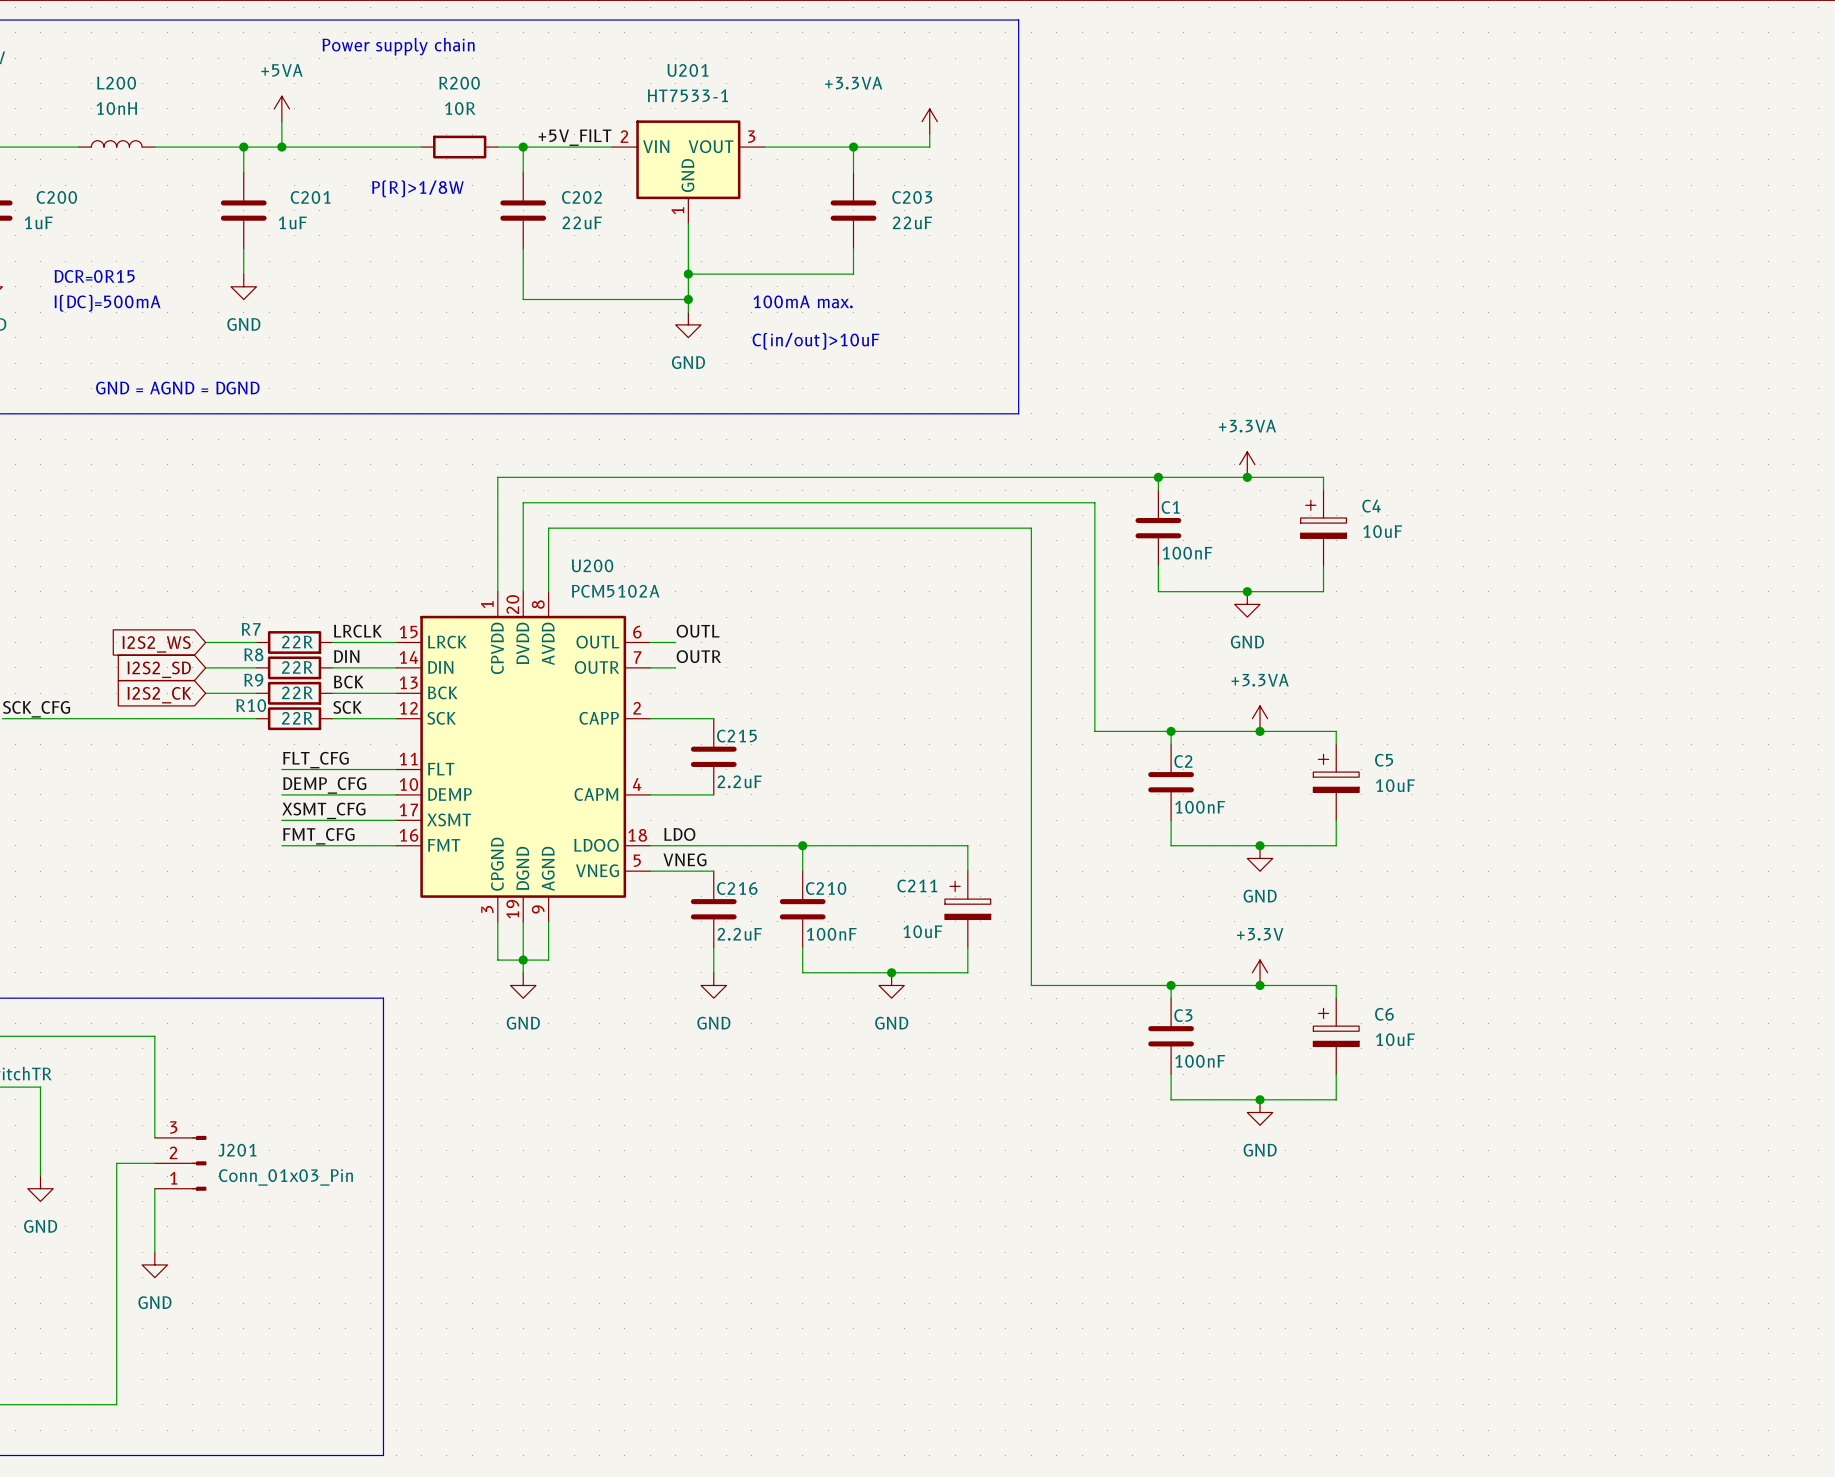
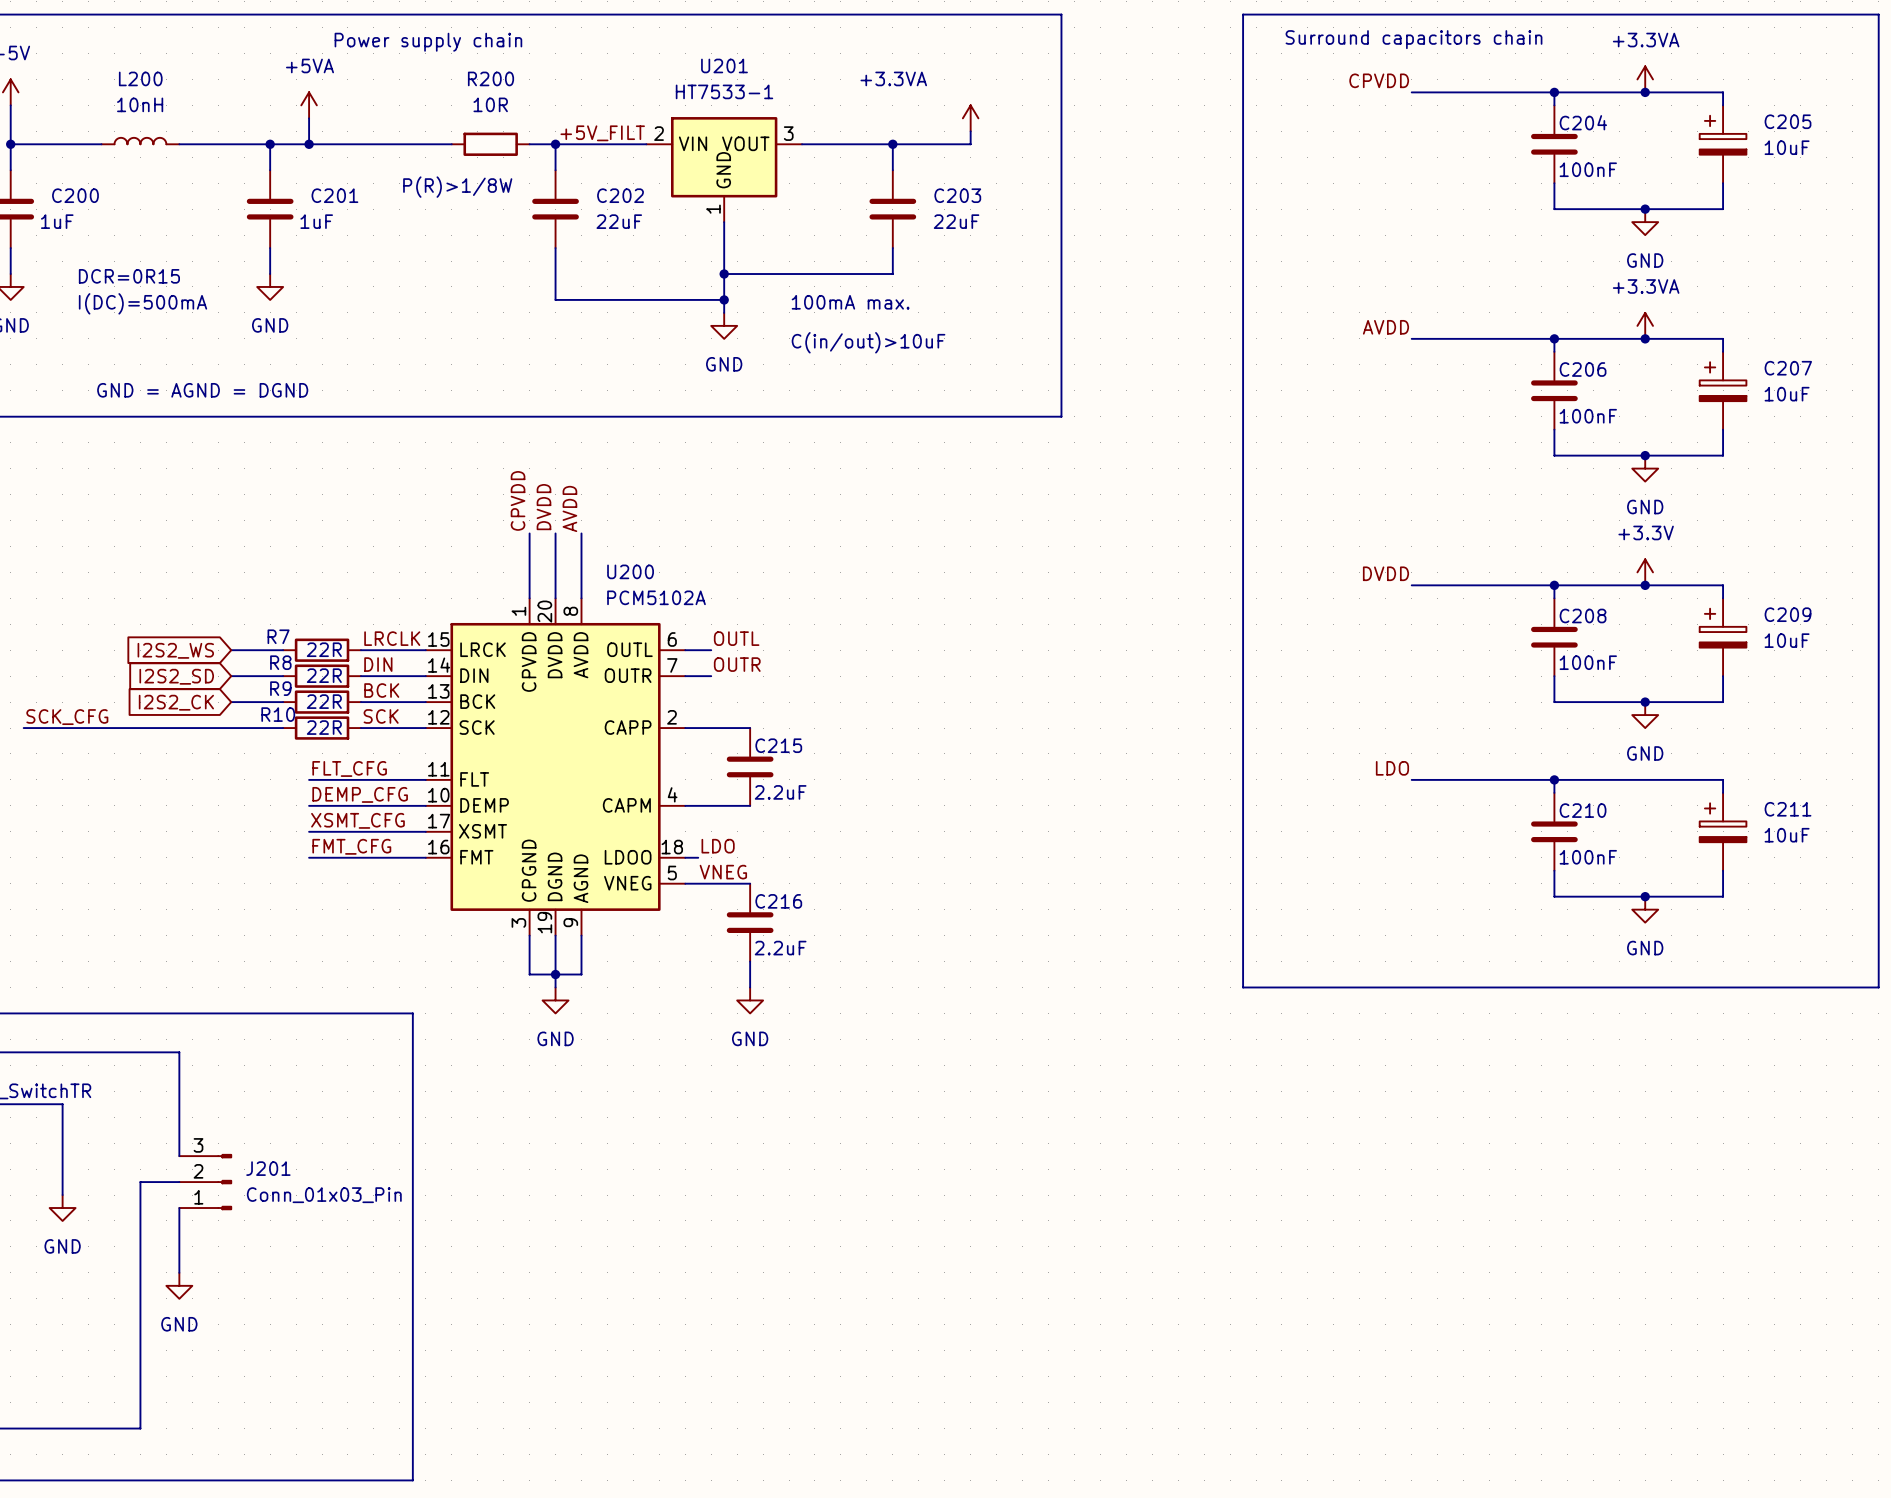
line: none -> (1243, 14) (1878, 14) (1878, 987) (1243, 987) (1243, 14)
text: none -> Surround capacitors chain (1414, 39)
power symbol: none -> +3.3VA (1645, 79)
label: none -> CPVDD (1379, 80)
wire: none -> (1411, 92) (1723, 92) (1723, 105)
wire: none -> (1554, 92) (1554, 105)
junction: none -> (1554, 92)
junction: none -> (1645, 92)
C204: none -> 100nF (1554, 144)
C205: none -> 10uF (1723, 144)
wire: none -> (1554, 183) (1554, 209) (1723, 209) (1723, 183)
junction: none -> (1645, 209)
power symbol: none -> GND (1645, 222)
power symbol: none -> +3.3VA (1645, 325)
label: none -> AVDD (1385, 327)
wire: none -> (1411, 338) (1723, 338) (1723, 351)
wire: none -> (1554, 338) (1554, 351)
junction: none -> (1554, 338)
junction: none -> (1645, 338)
C206: none -> 100nF (1554, 390)
C207: none -> 10uF (1723, 390)
wire: none -> (1554, 429) (1554, 455) (1723, 455) (1723, 429)
junction: none -> (1645, 455)
power symbol: +3.3VA (1247, 464) -> none
power symbol: none -> GND (1645, 468)
wire: (1158, 477) (1158, 490) -> none
junction: (1158, 477) -> none
junction: (1247, 477) -> none
wire: (1323, 490) (1323, 477) (497, 477) (497, 528) -> none
label: none -> CPVDD (518, 500)
label: none -> DVDD (543, 507)
label: none -> AVDD (569, 508)
wire: (523, 528) (523, 502) (1094, 502) (1094, 731) (1336, 731) (1336, 744) -> none
wire: (548, 528) (1031, 528) (1031, 985) (1336, 985) (1336, 998) -> none
C1: 100nF (1158, 528) -> none
C4: 10uF (1323, 528) -> none
wire: (1158, 566) (1158, 591) (1323, 591) (1323, 566) -> none
power symbol: none -> +3.3V (1645, 572)
label: none -> DVDD (1385, 573)
wire: none -> (1411, 585) (1723, 585) (1723, 598)
wire: none -> (1554, 585) (1554, 598)
junction: none -> (1554, 585)
junction: none -> (1645, 585)
junction: (1247, 591) -> none
power symbol: GND (1247, 604) -> none
C208: none -> 100nF (1554, 637)
C209: none -> 10uF (1723, 637)
wire: none -> (1554, 676) (1554, 702) (1723, 702) (1723, 676)
junction: none -> (1645, 702)
power symbol: none -> GND (1645, 715)
power symbol: +3.3VA (1260, 718) -> none
wire: (1171, 731) (1171, 744) -> none
junction: (1171, 731) -> none
junction: (1260, 731) -> none
label: none -> LDO (1392, 768)
wire: none -> (1411, 779) (1723, 779) (1723, 792)
wire: none -> (1554, 779) (1554, 792)
junction: none -> (1554, 779)
C2: 100nF (1171, 782) -> none
C5: 10uF (1336, 782) -> none
wire: (1171, 820) (1171, 845) (1336, 845) (1336, 820) -> none
wire: (662, 845) (967, 845) (967, 871) -> none
wire: (802, 845) (802, 871) -> none
junction: (802, 845) -> none
junction: (1260, 845) -> none
power symbol: GND (1260, 858) -> none
wire: none -> (1554, 870) (1554, 896) (1723, 896) (1723, 870)
junction: none -> (1645, 896)
C211 name position: C211 (917, 885) -> C211 (1788, 809)
power symbol: none -> GND (1645, 909)
C210 position: (802, 909) -> (1554, 831)
C211 position: (967, 909) -> (1723, 831)
C211 value position: 10uF (922, 931) -> 10uF (1787, 835)
wire: (802, 947) (802, 972) (967, 972) (967, 947) -> none
junction: (891, 972) -> none
power symbol: +3.3V (1260, 972) -> none
power symbol: GND (891, 985) -> none
wire: (1171, 985) (1171, 998) -> none
junction: (1171, 985) -> none
junction: (1260, 985) -> none
C3: 100nF (1171, 1036) -> none
C6: 10uF (1336, 1036) -> none
wire: (1171, 1074) (1171, 1099) (1336, 1099) (1336, 1074) -> none
junction: (1260, 1099) -> none
power symbol: GND (1260, 1112) -> none

